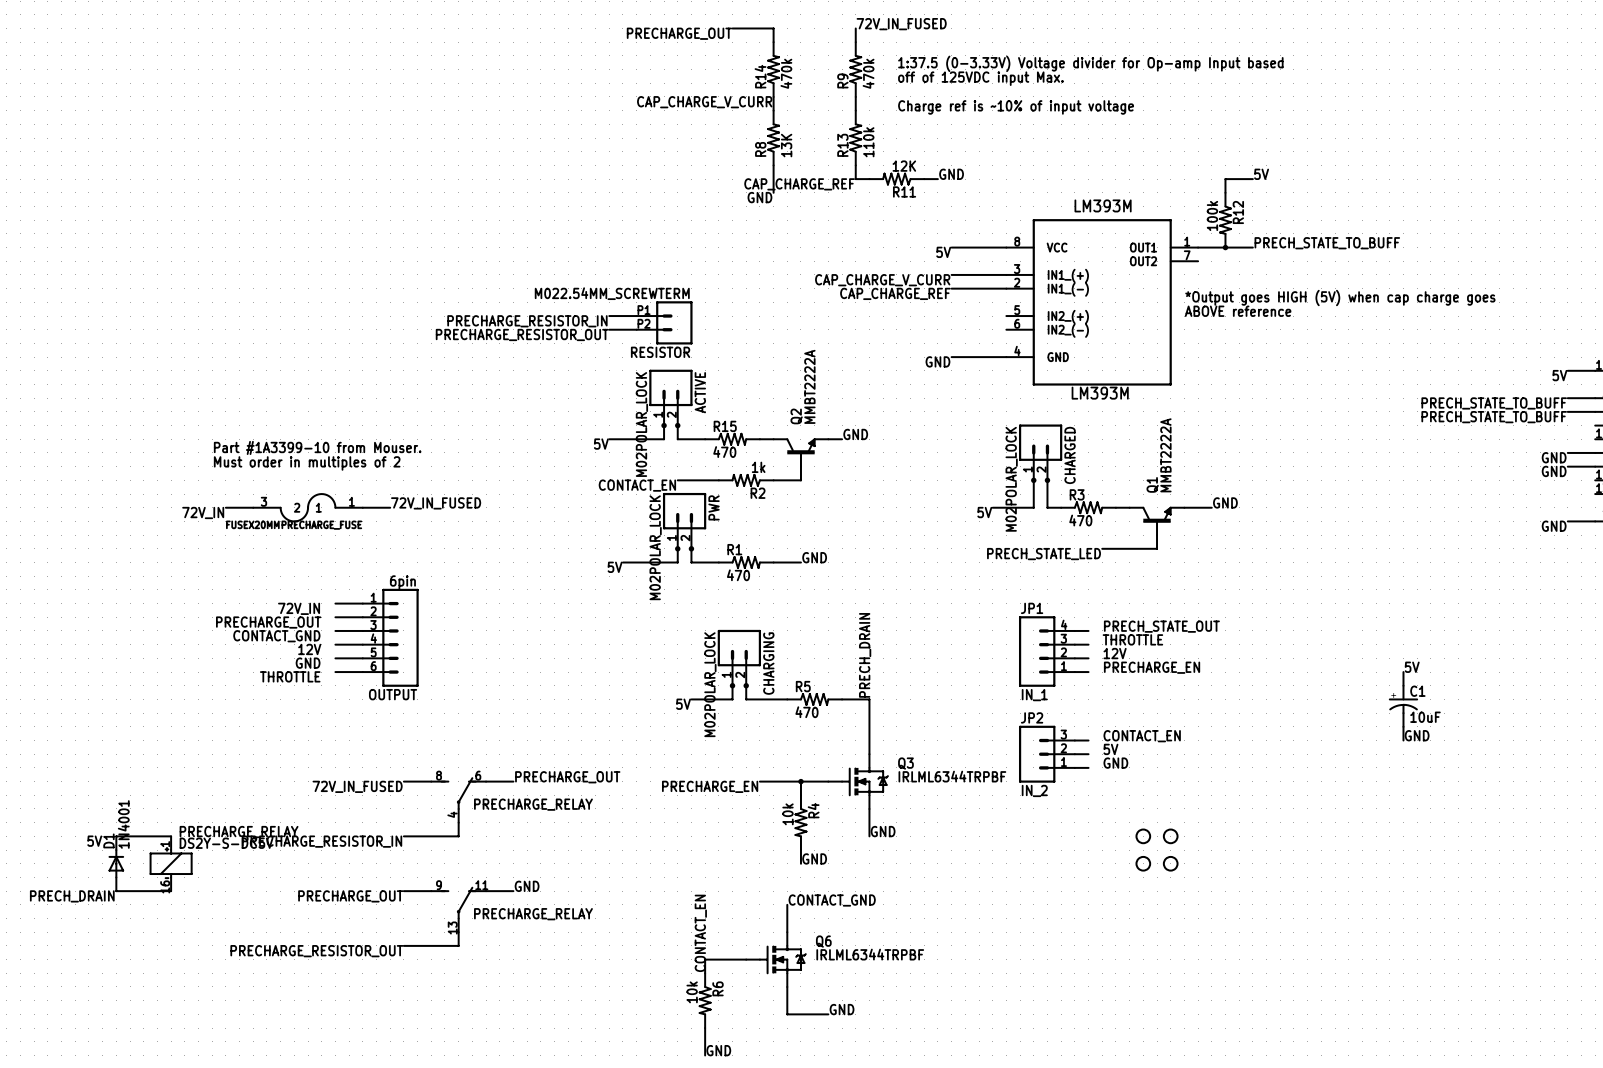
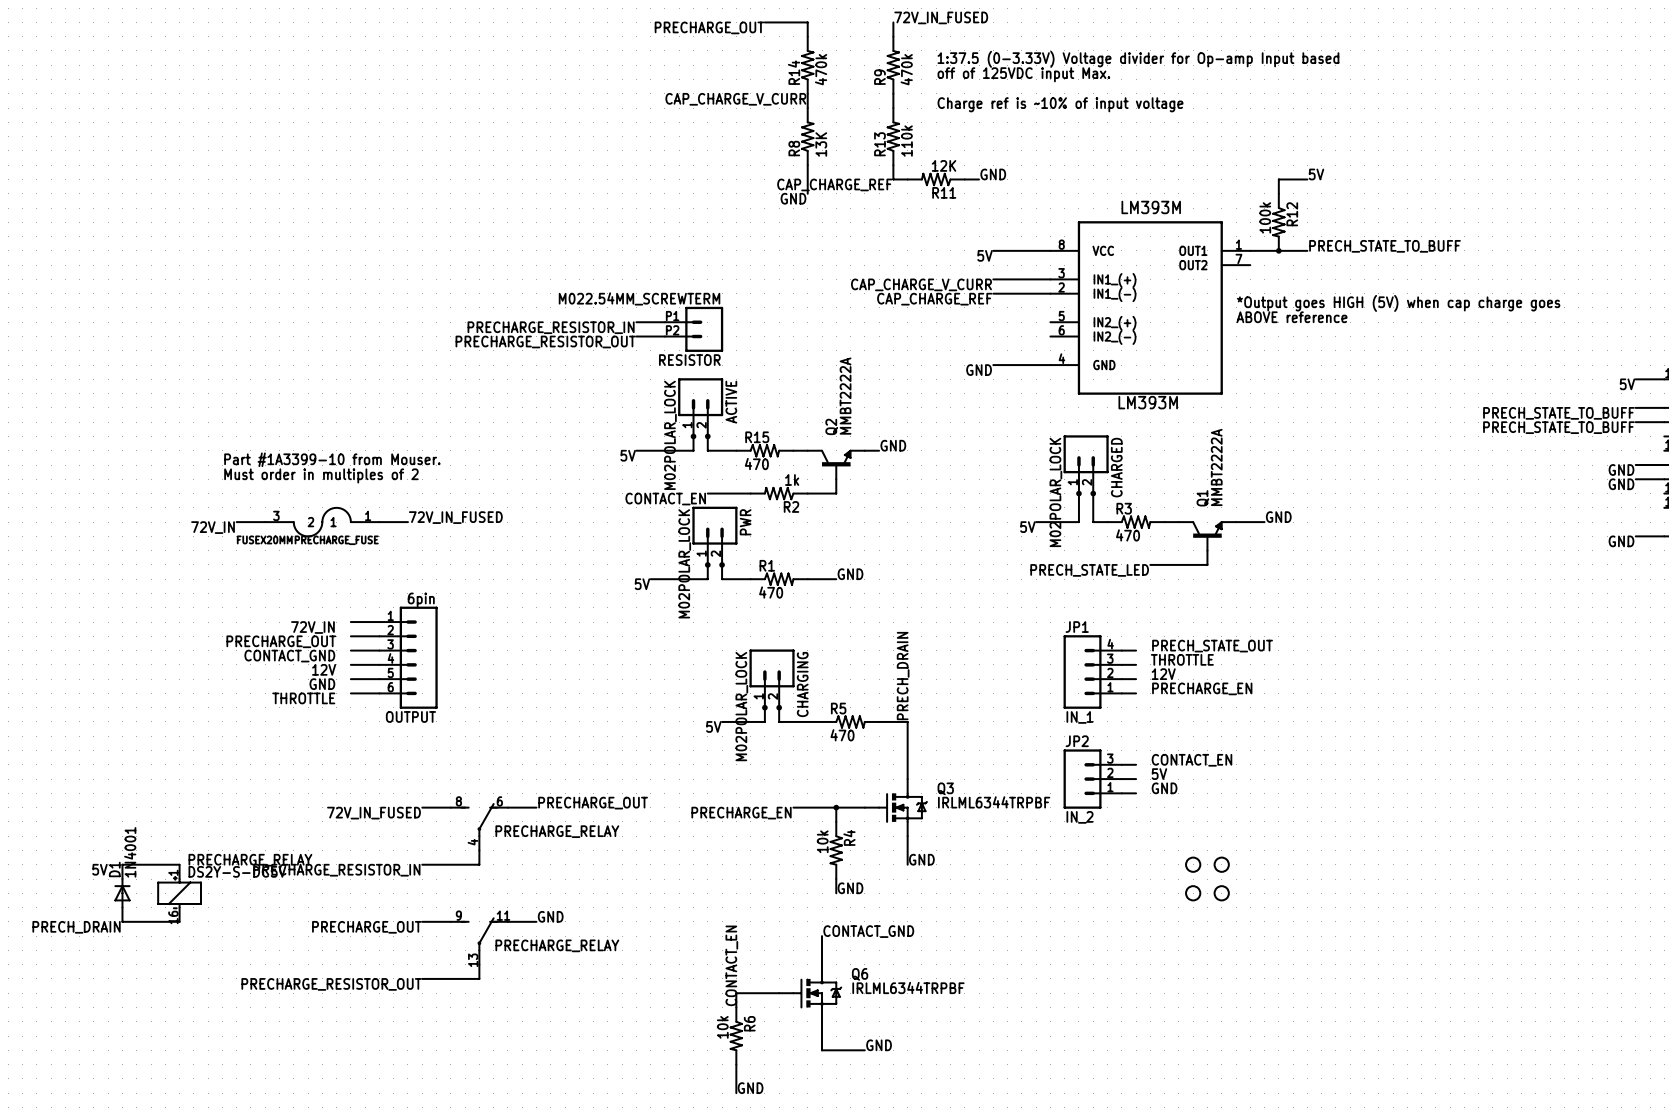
label: 5V (1412, 667) -> none
wire: (1403, 672) (1403, 685) -> none
C1: 10uF (1403, 706) -> none
wire: (1403, 726) (1403, 740) -> none
label: GND (1417, 735) -> none

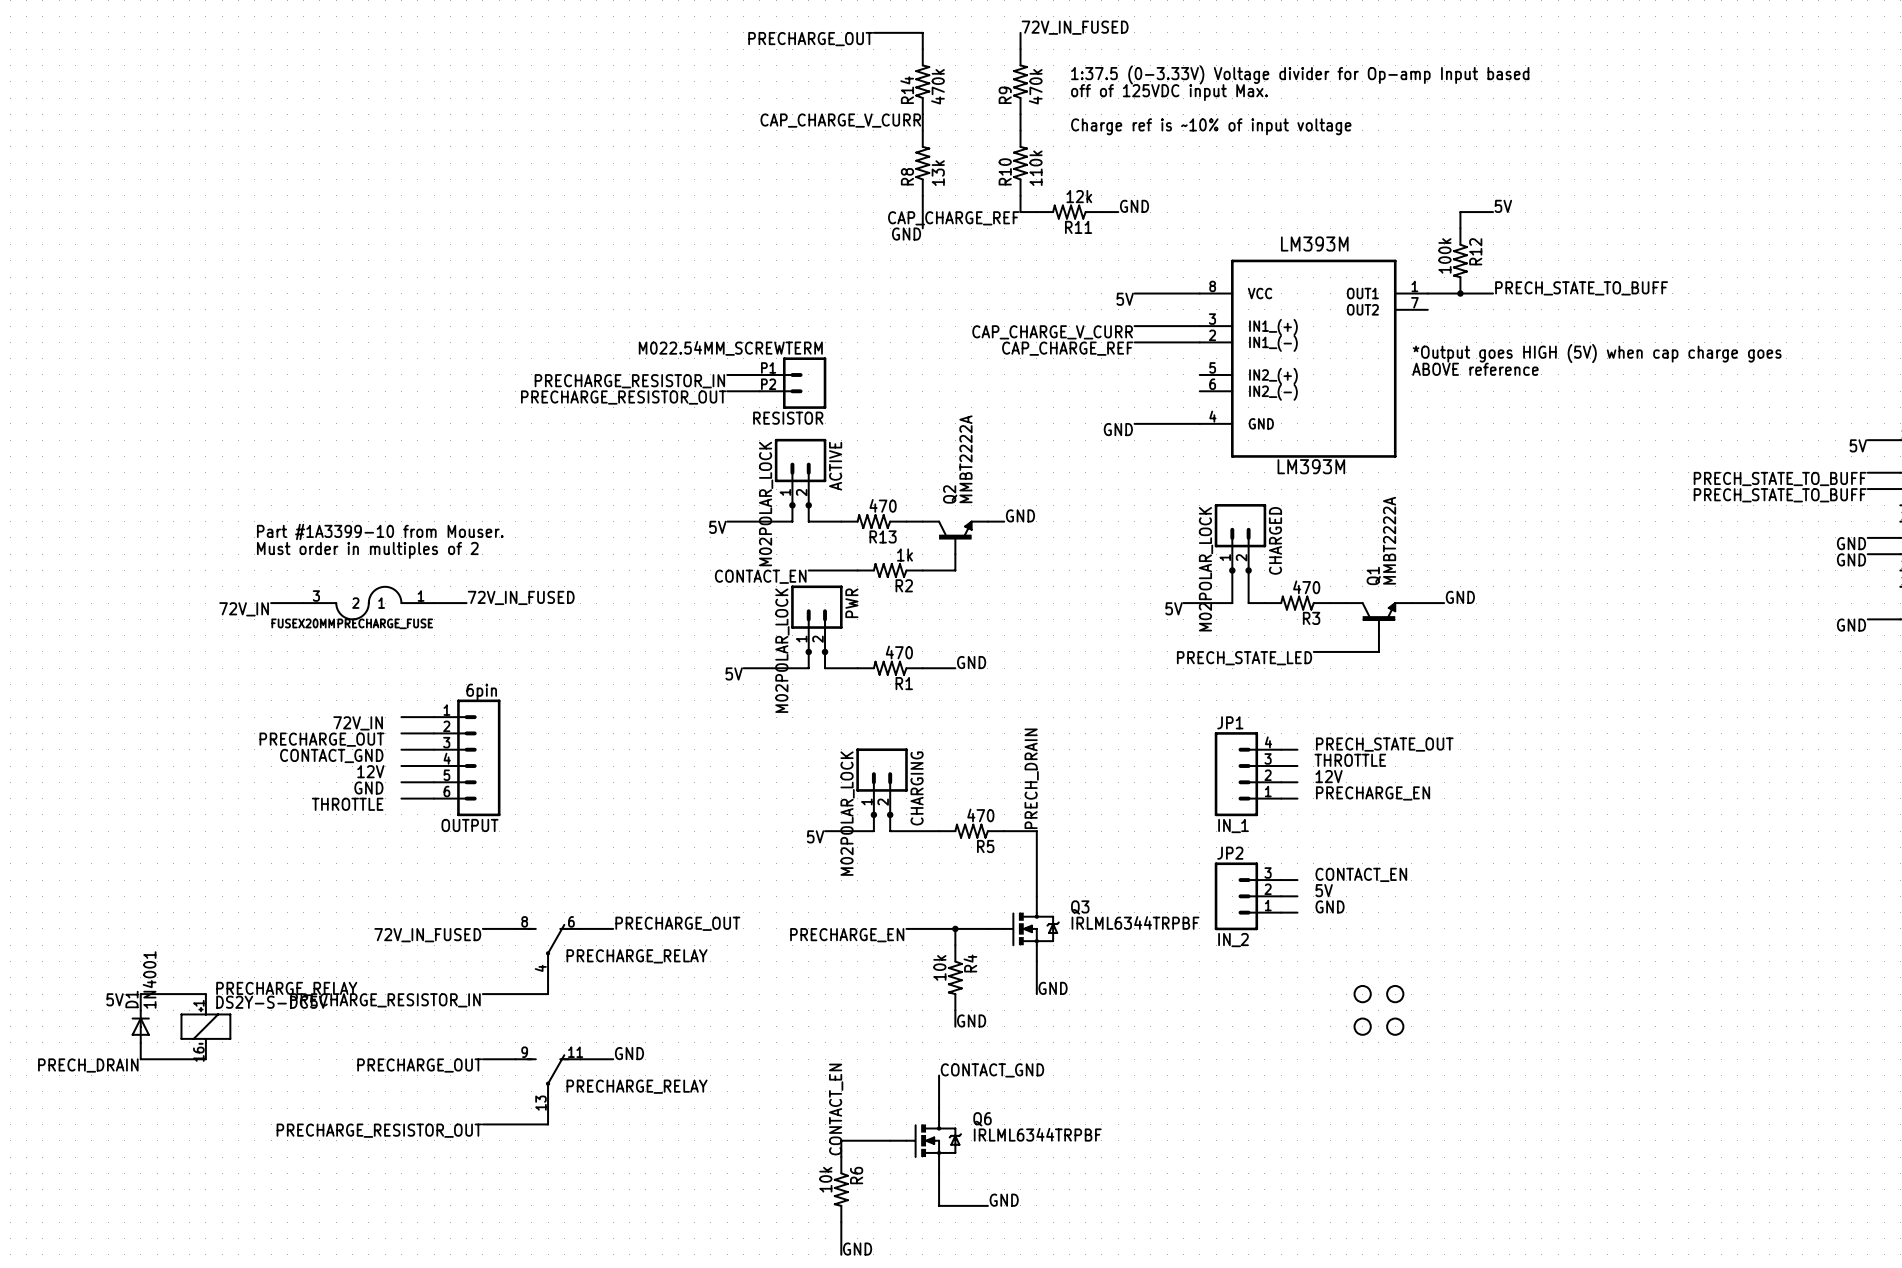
R8 value: 13K (821, 144) -> 13k (938, 173)
R13 name: R13 (879, 144) -> R10 (1005, 171)
R11 value: 12K (944, 165) -> 12k (1079, 196)
R15: 470 (764, 450) -> none
R13: none -> 470 (873, 521)
R3 rotation: 0° (1136, 522) -> 180° (1297, 603)
R1 rotation: 0° (779, 579) -> 180° (890, 668)
R5 rotation: 0° (850, 721) -> 180° (971, 831)

